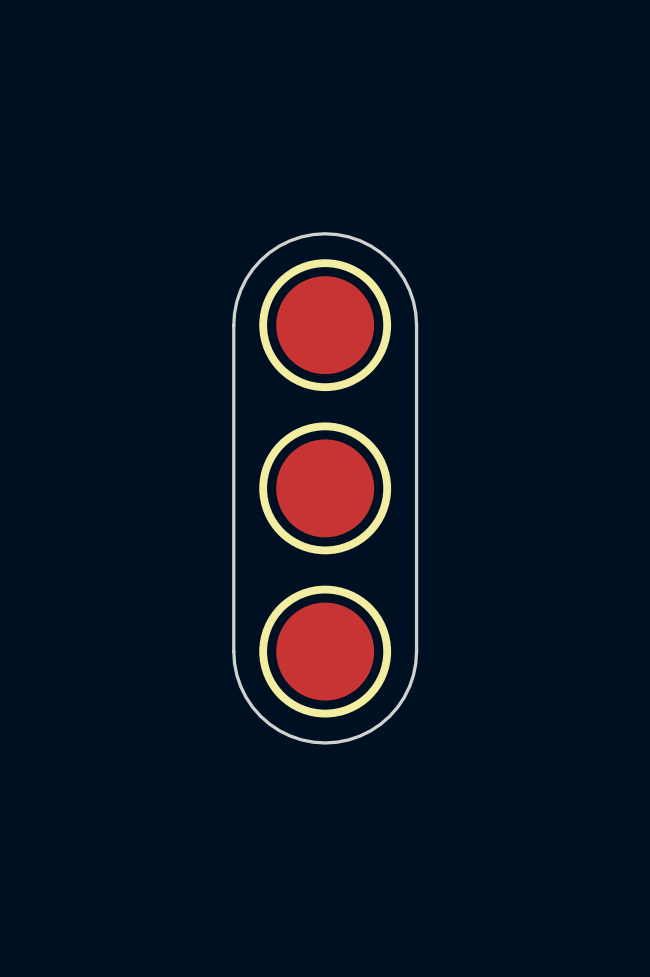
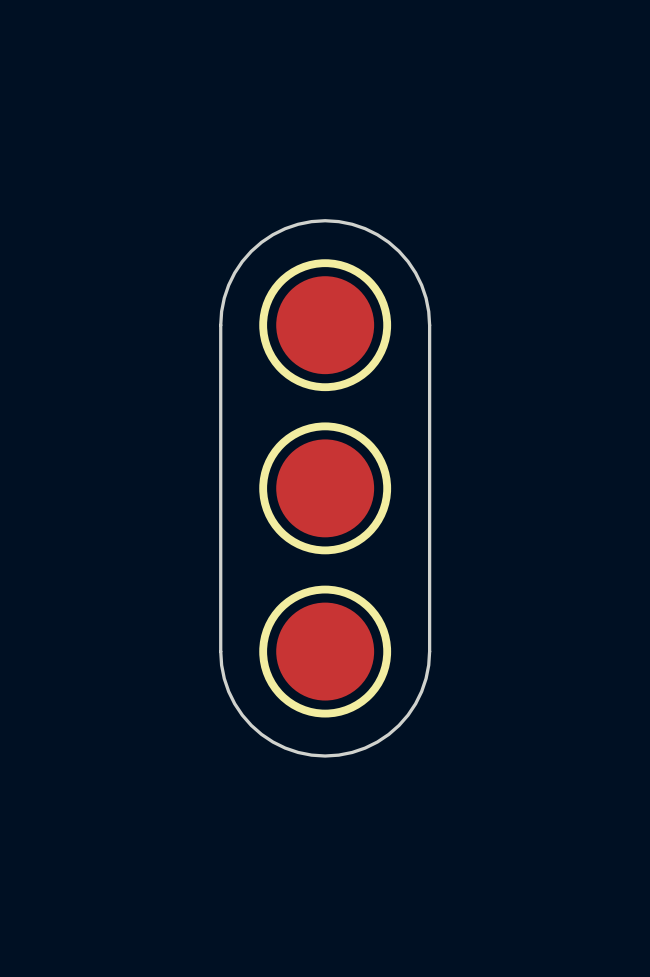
board edge: (233, 325) (233, 651) (236, 675) (246, 697) (252, 707) (260, 716) (279, 730) (301, 739) (313, 742) (325, 742) (348, 739) (370, 730) (389, 716) (404, 697) (413, 675) (415, 663) (416, 325) (413, 301) (409, 290) (397, 269) (380, 252) (370, 246) (360, 240) (337, 234) (313, 234) (290, 240) (279, 246) (269, 252) (252, 269) (240, 290) (234, 313) (233, 325) -> (220, 325) (220, 651) (224, 678) (234, 703) (242, 715) (251, 725) (272, 742) (285, 748) (311, 755) (338, 755) (352, 752) (377, 742) (399, 725) (415, 703) (426, 678) (428, 665) (429, 325) (426, 298) (421, 285) (408, 261) (399, 251) (377, 234) (352, 224) (338, 221) (311, 221) (298, 224) (272, 234) (251, 251) (242, 261) (228, 285) (224, 298) (220, 325)

